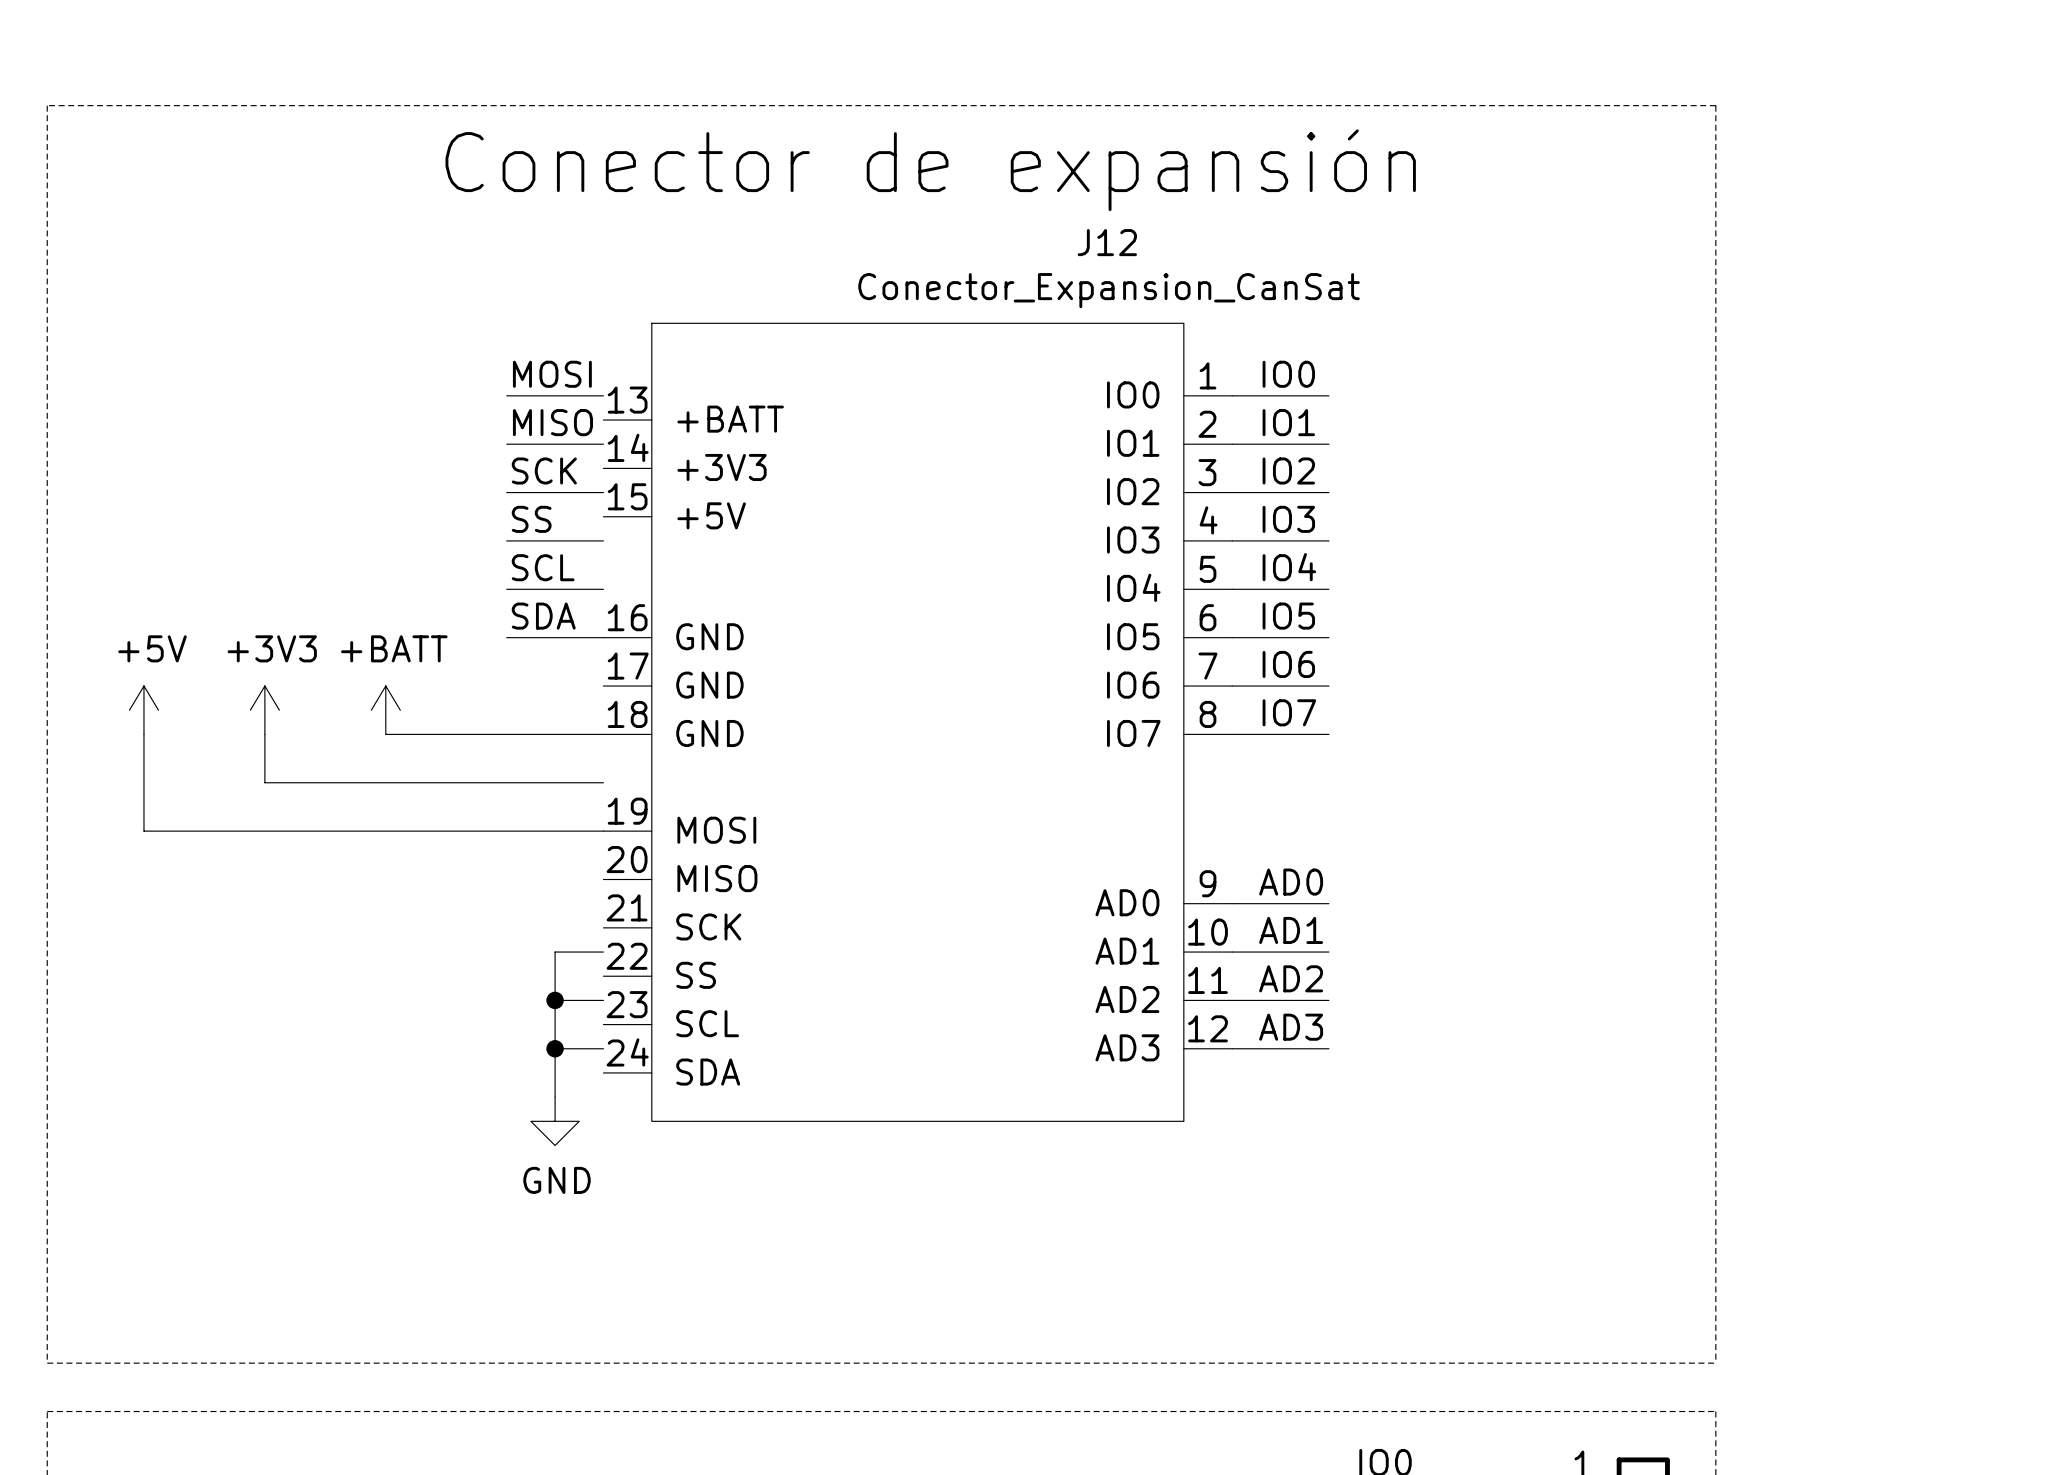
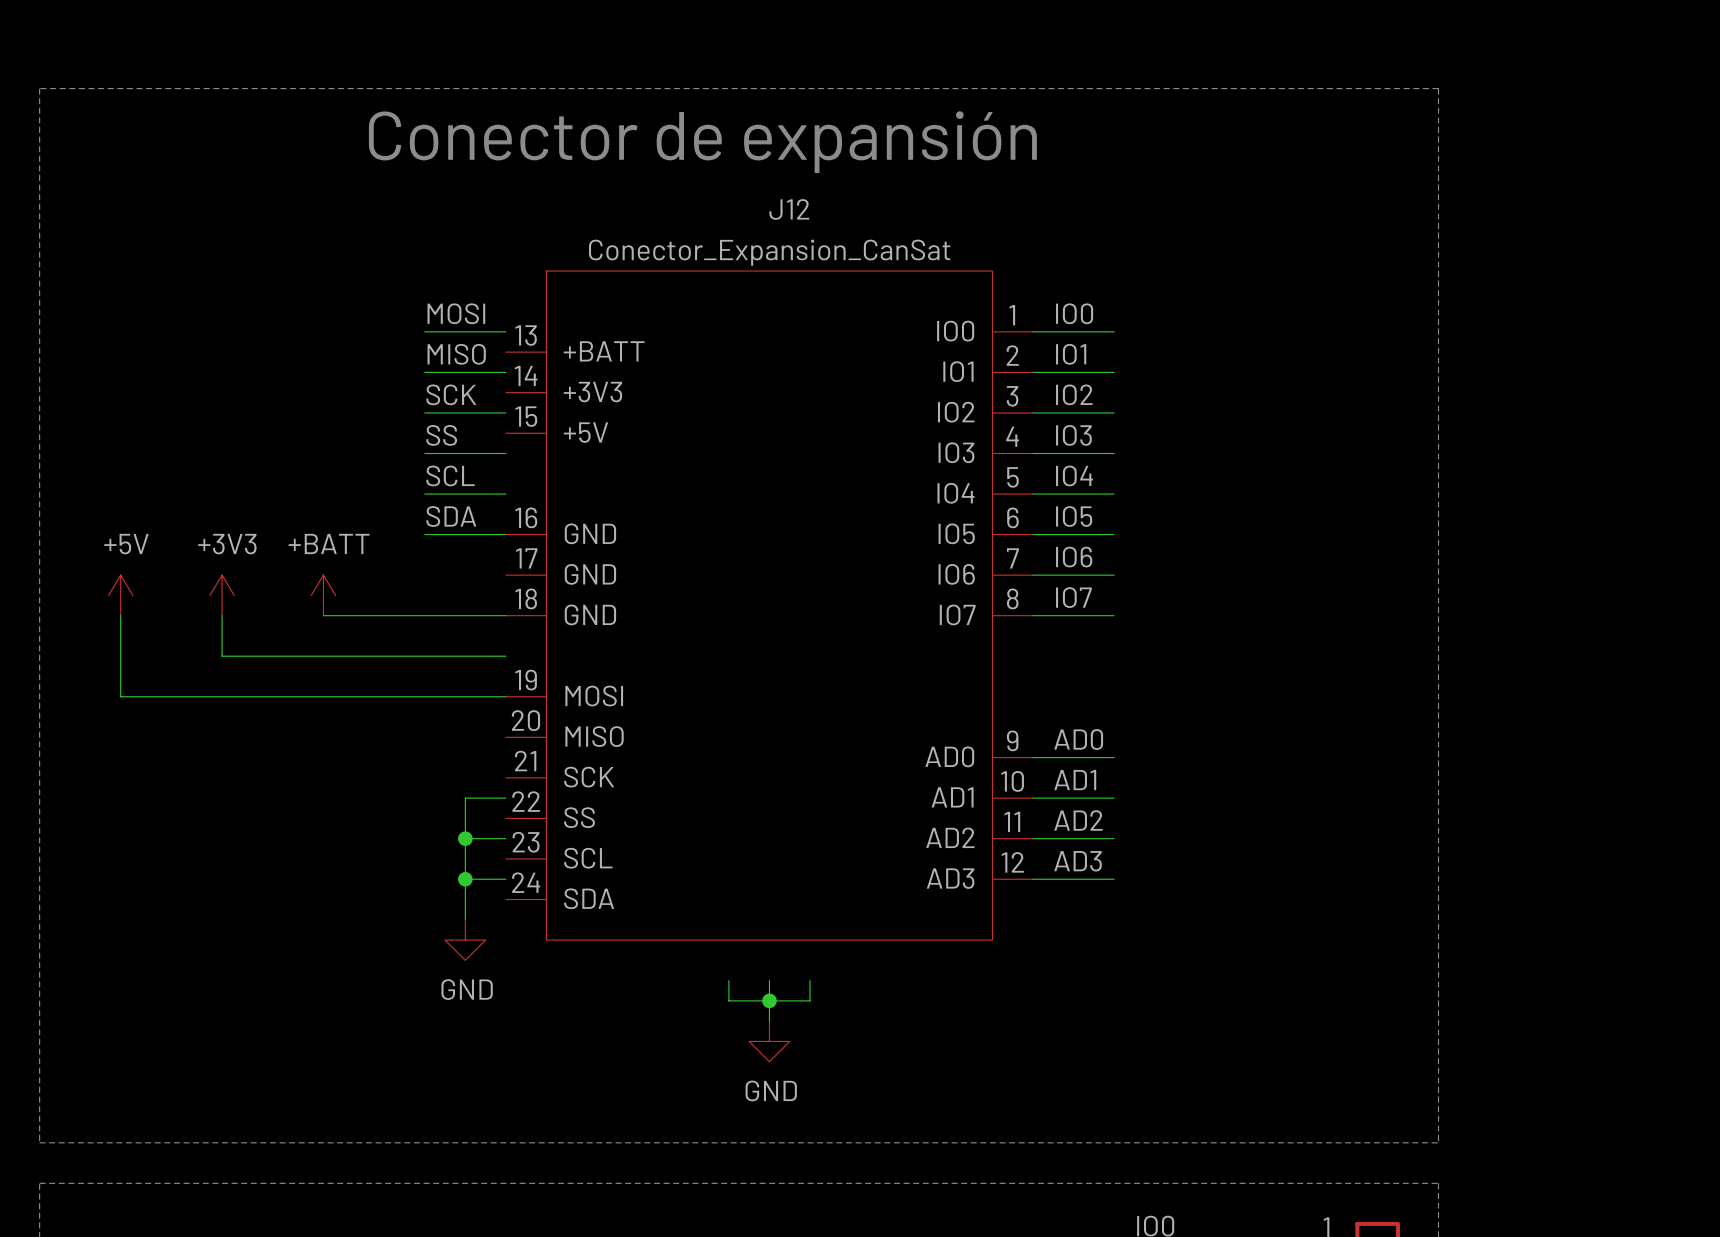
J12 name position: J12 (1107, 242) -> J12 (789, 209)
J12 value position: Conector_Expansion_CanSat (1109, 290) -> Conector_Expansion_CanSat (769, 252)
wire: none -> (728, 980) (728, 1000) (810, 1000) (810, 980)
wire: none -> (769, 980) (769, 1021)
junction: none -> (769, 1000)
power symbol: none -> GND (769, 1041)

